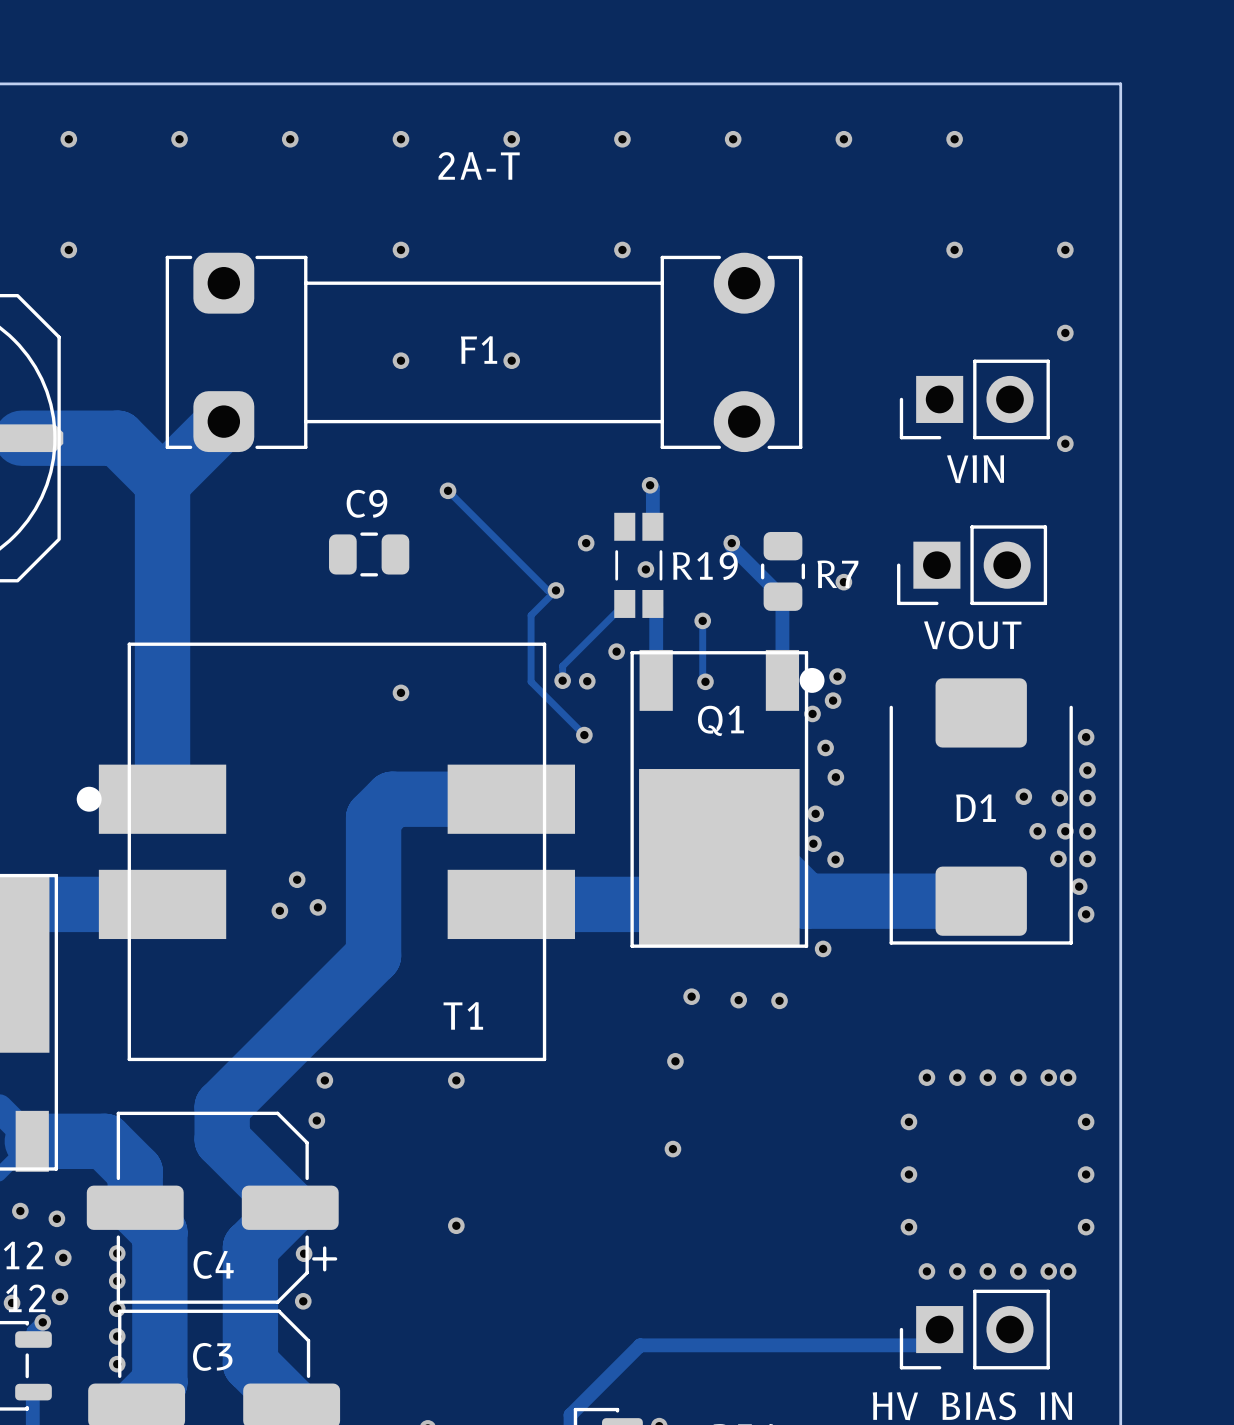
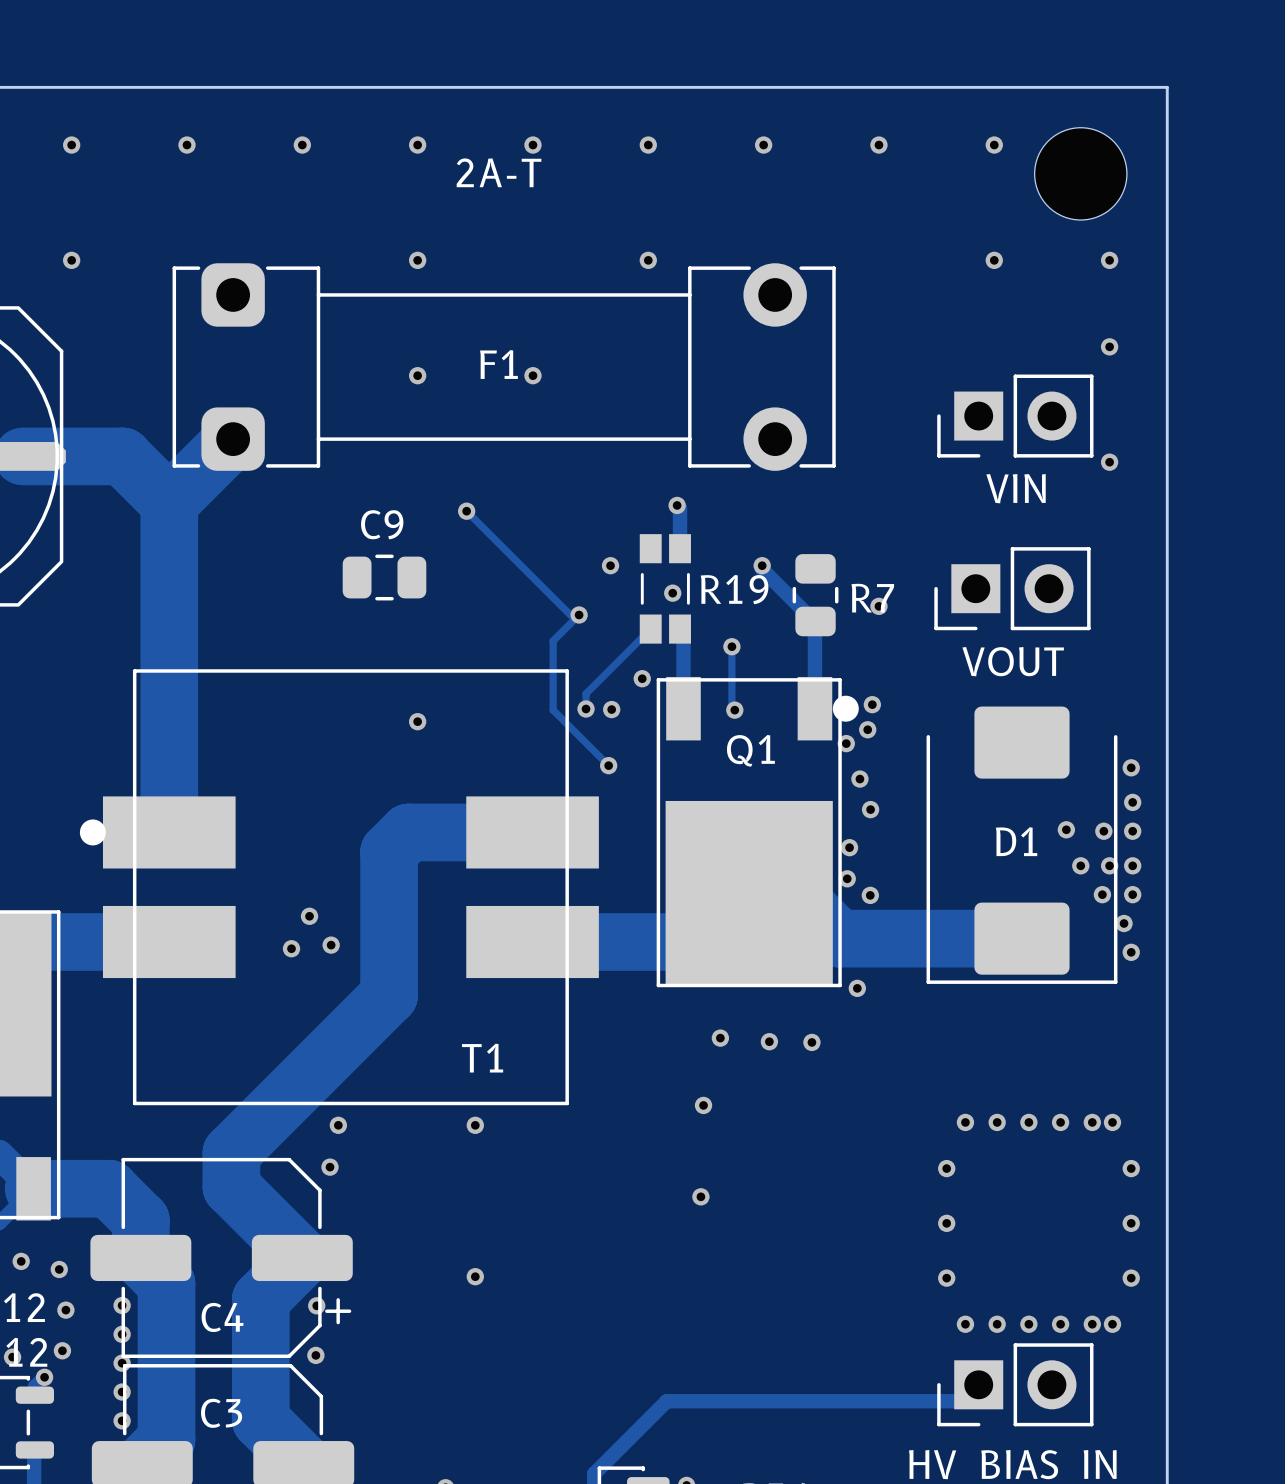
part: none -> (1080, 173)

